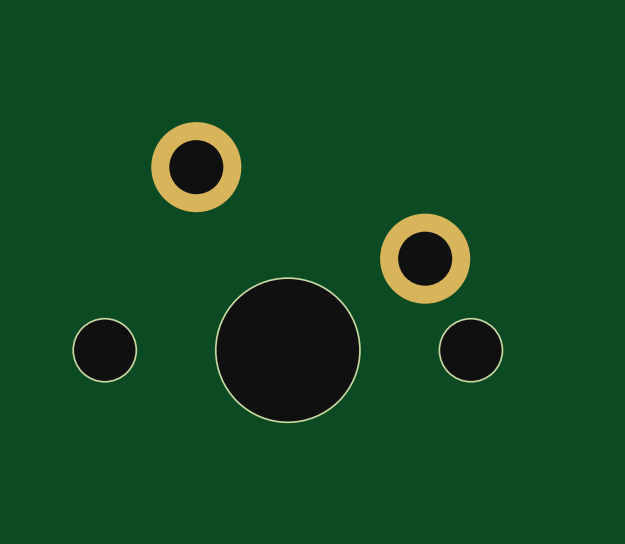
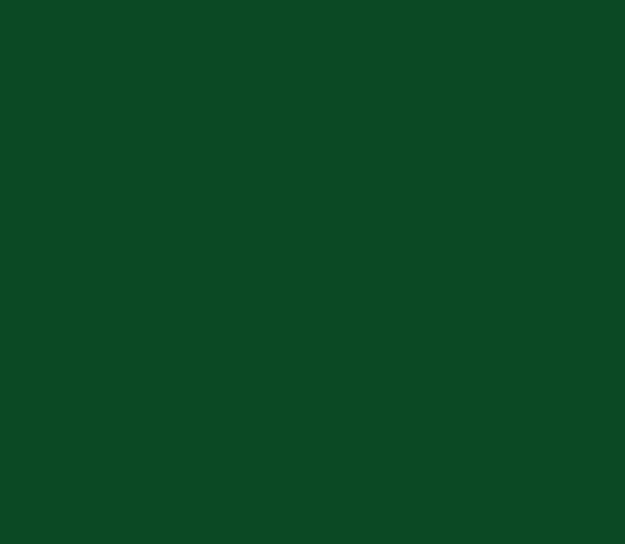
part: (287, 272) -> none

